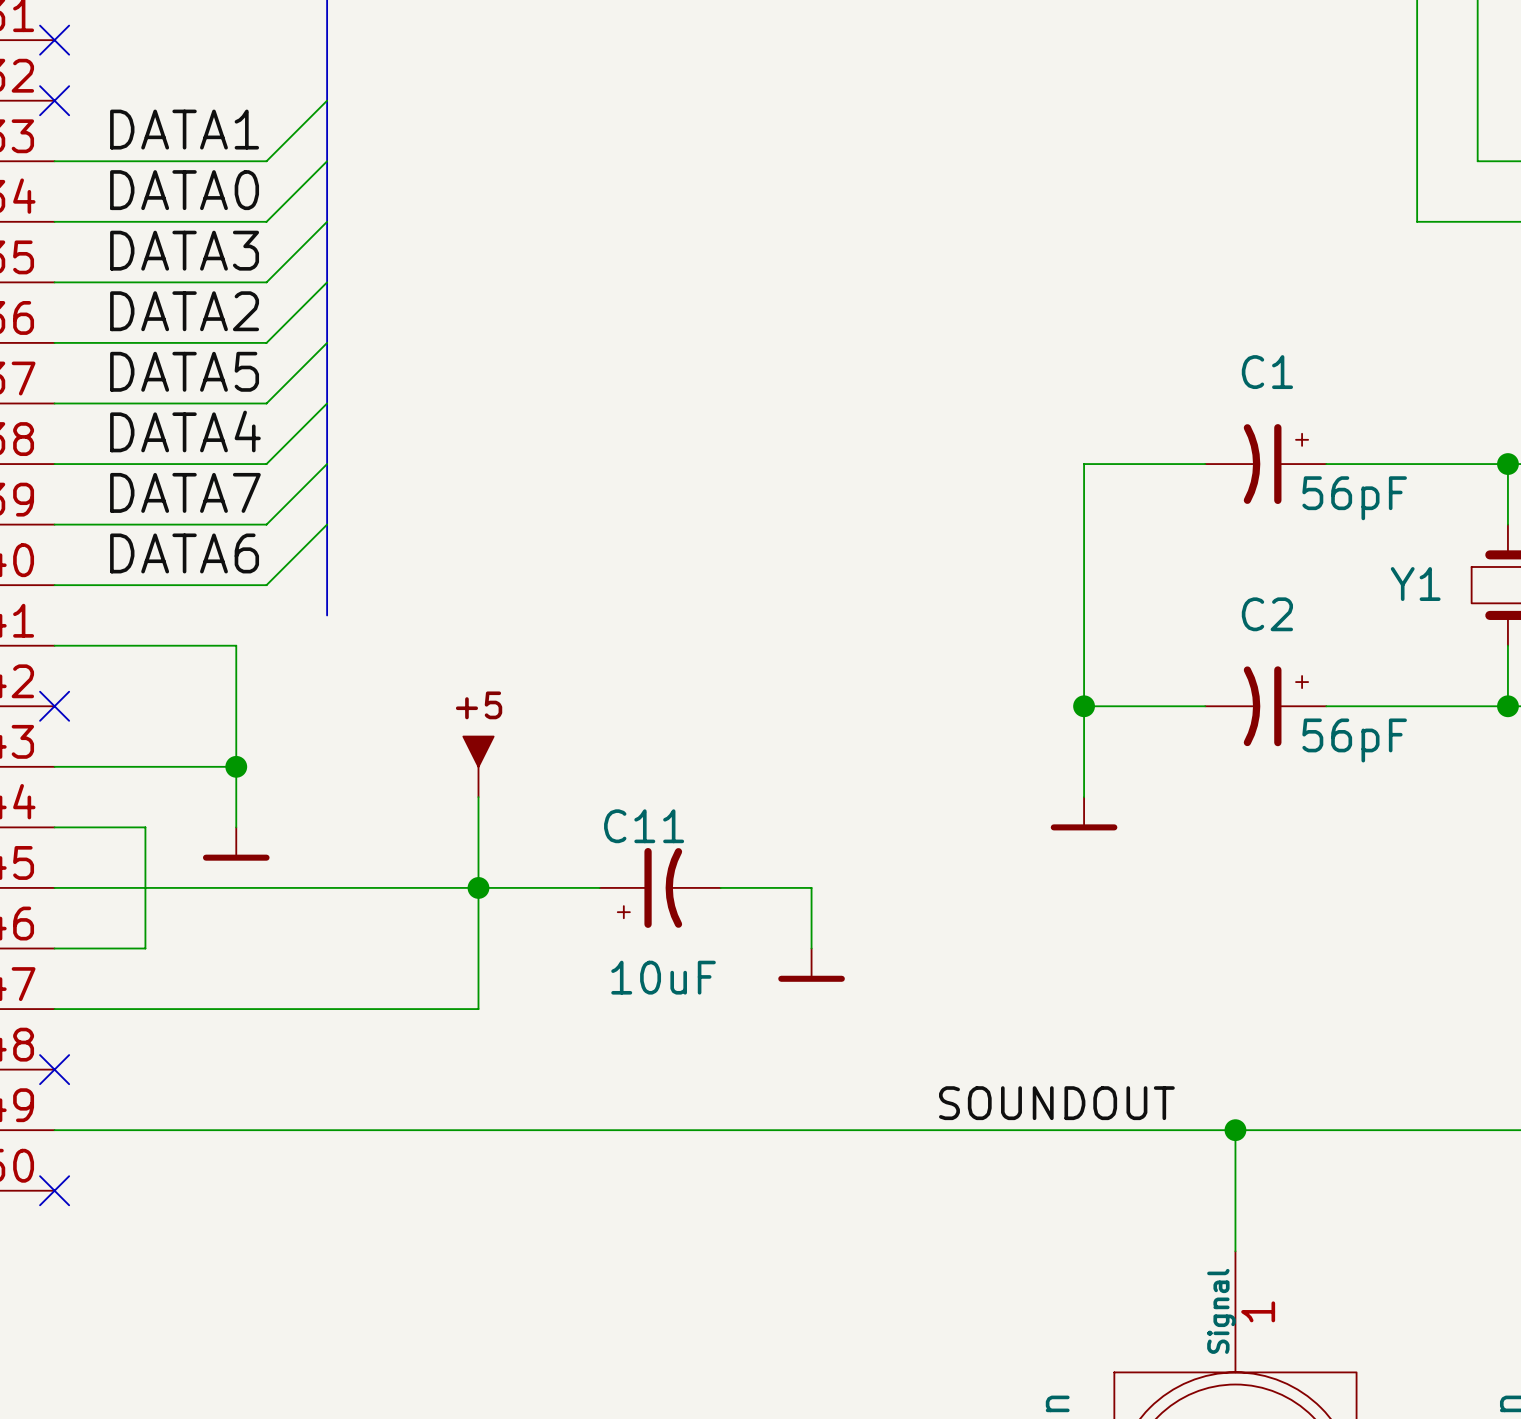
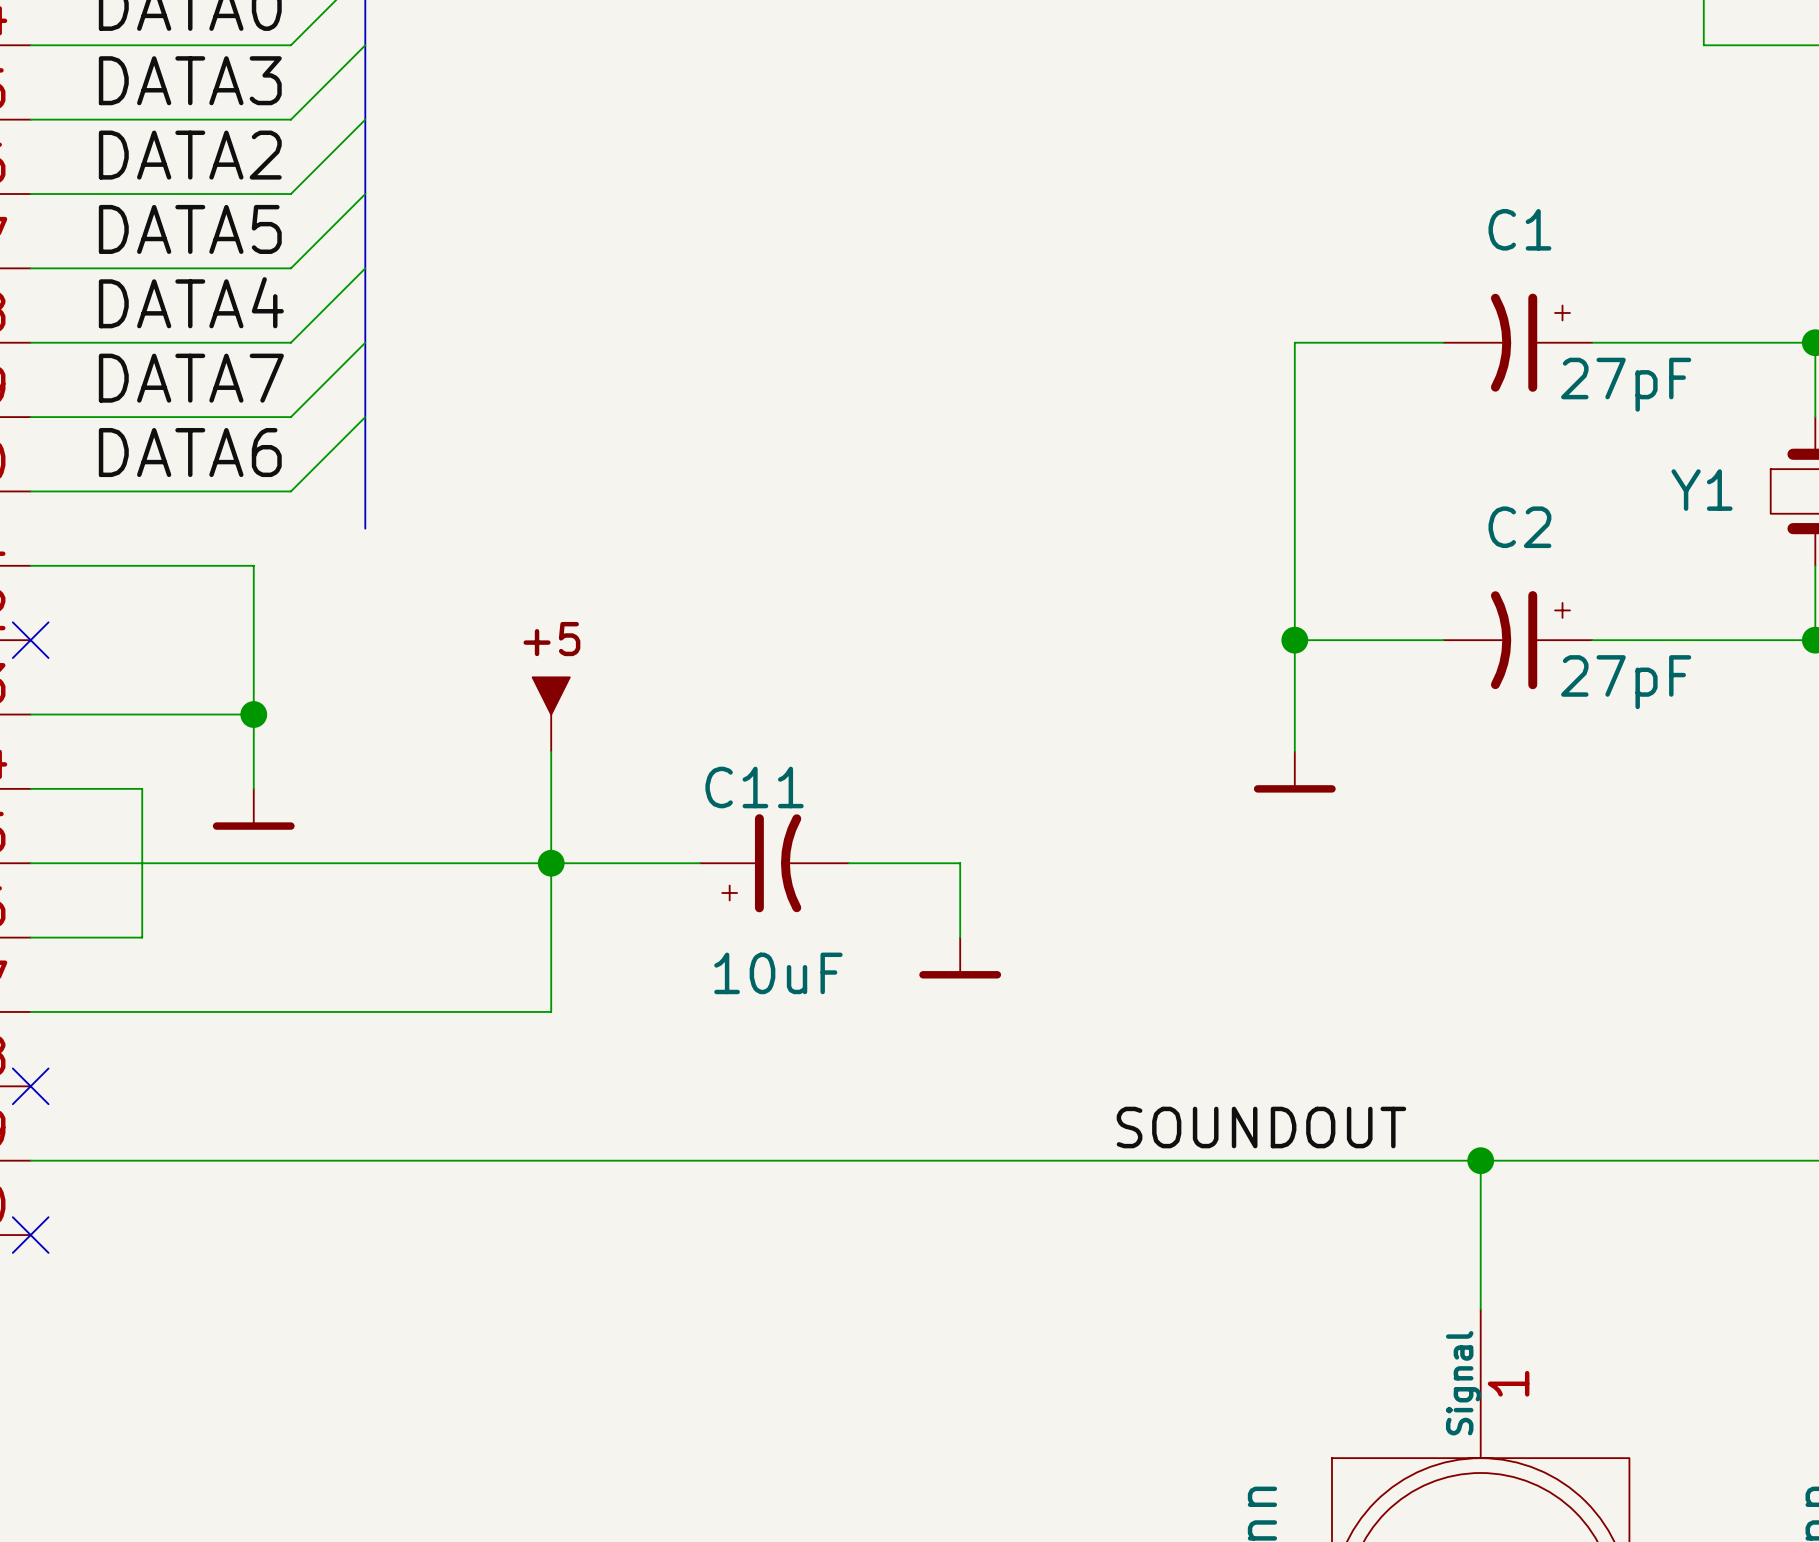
C1 value: 56pF (1354, 498) -> 27pF (1626, 384)
C2 value: 56pF (1354, 740) -> 27pF (1626, 682)

